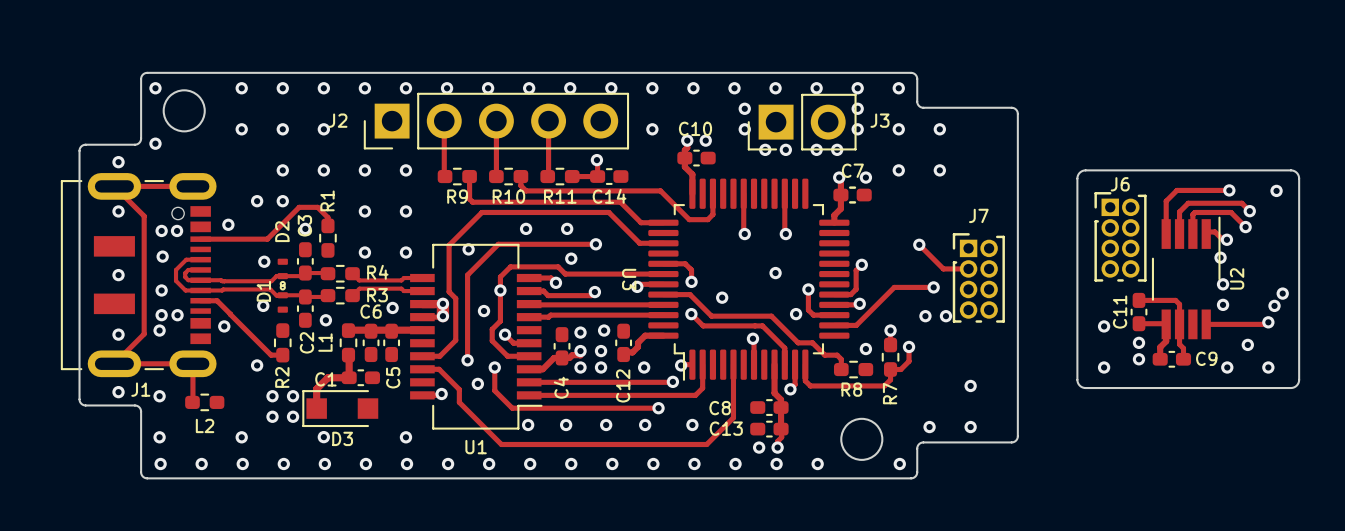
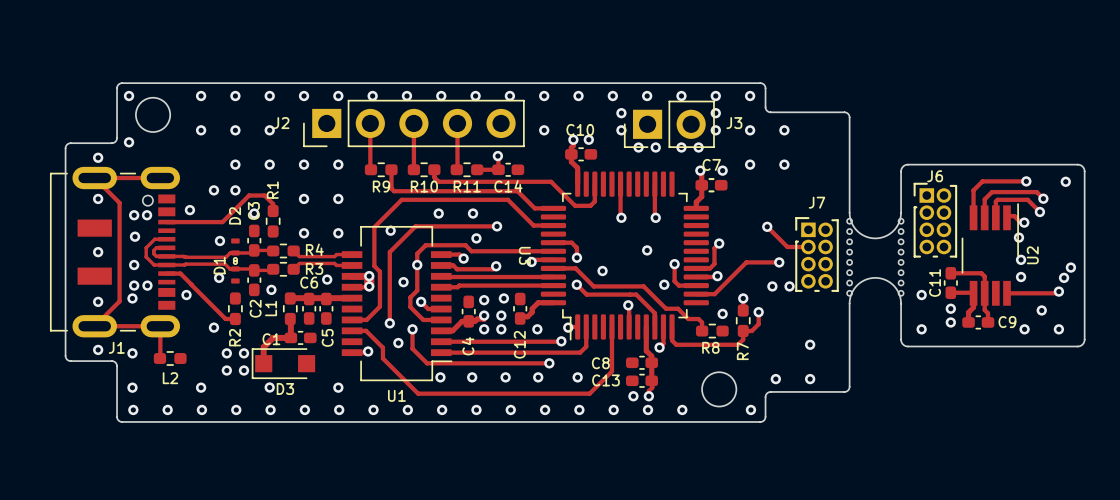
board edge: (1087, 170) (1080, 172) (1077, 178) (1077, 379) (1080, 386) (1087, 388) -> (907, 164) (901, 169) (900, 215) (898, 224) (892, 231) (878, 238) (866, 236) (854, 227) (849, 212)
board edge: (1017, 227) (1017, 336) -> (907, 346) (903, 344) (901, 340) (900, 297) (896, 288) (889, 282) (878, 278) (863, 280) (852, 291) (849, 303)
part: none -> (849, 257)
part: none -> (901, 257)

